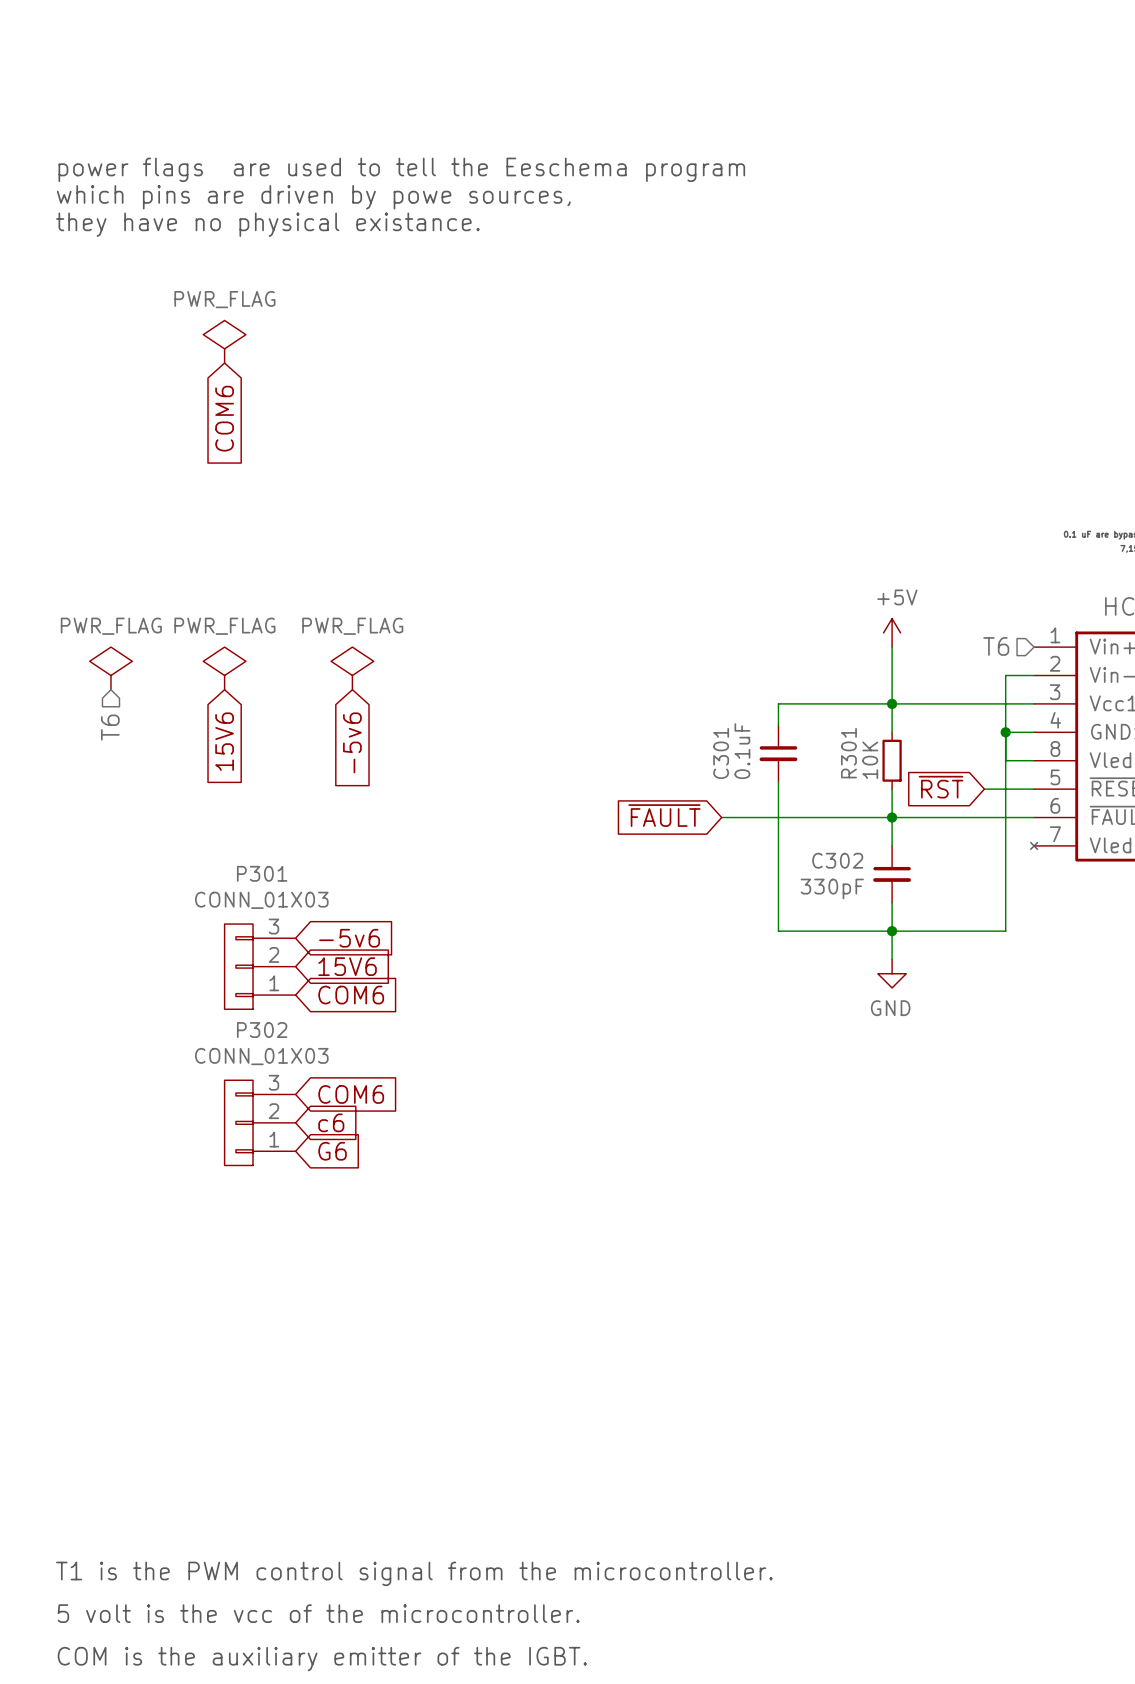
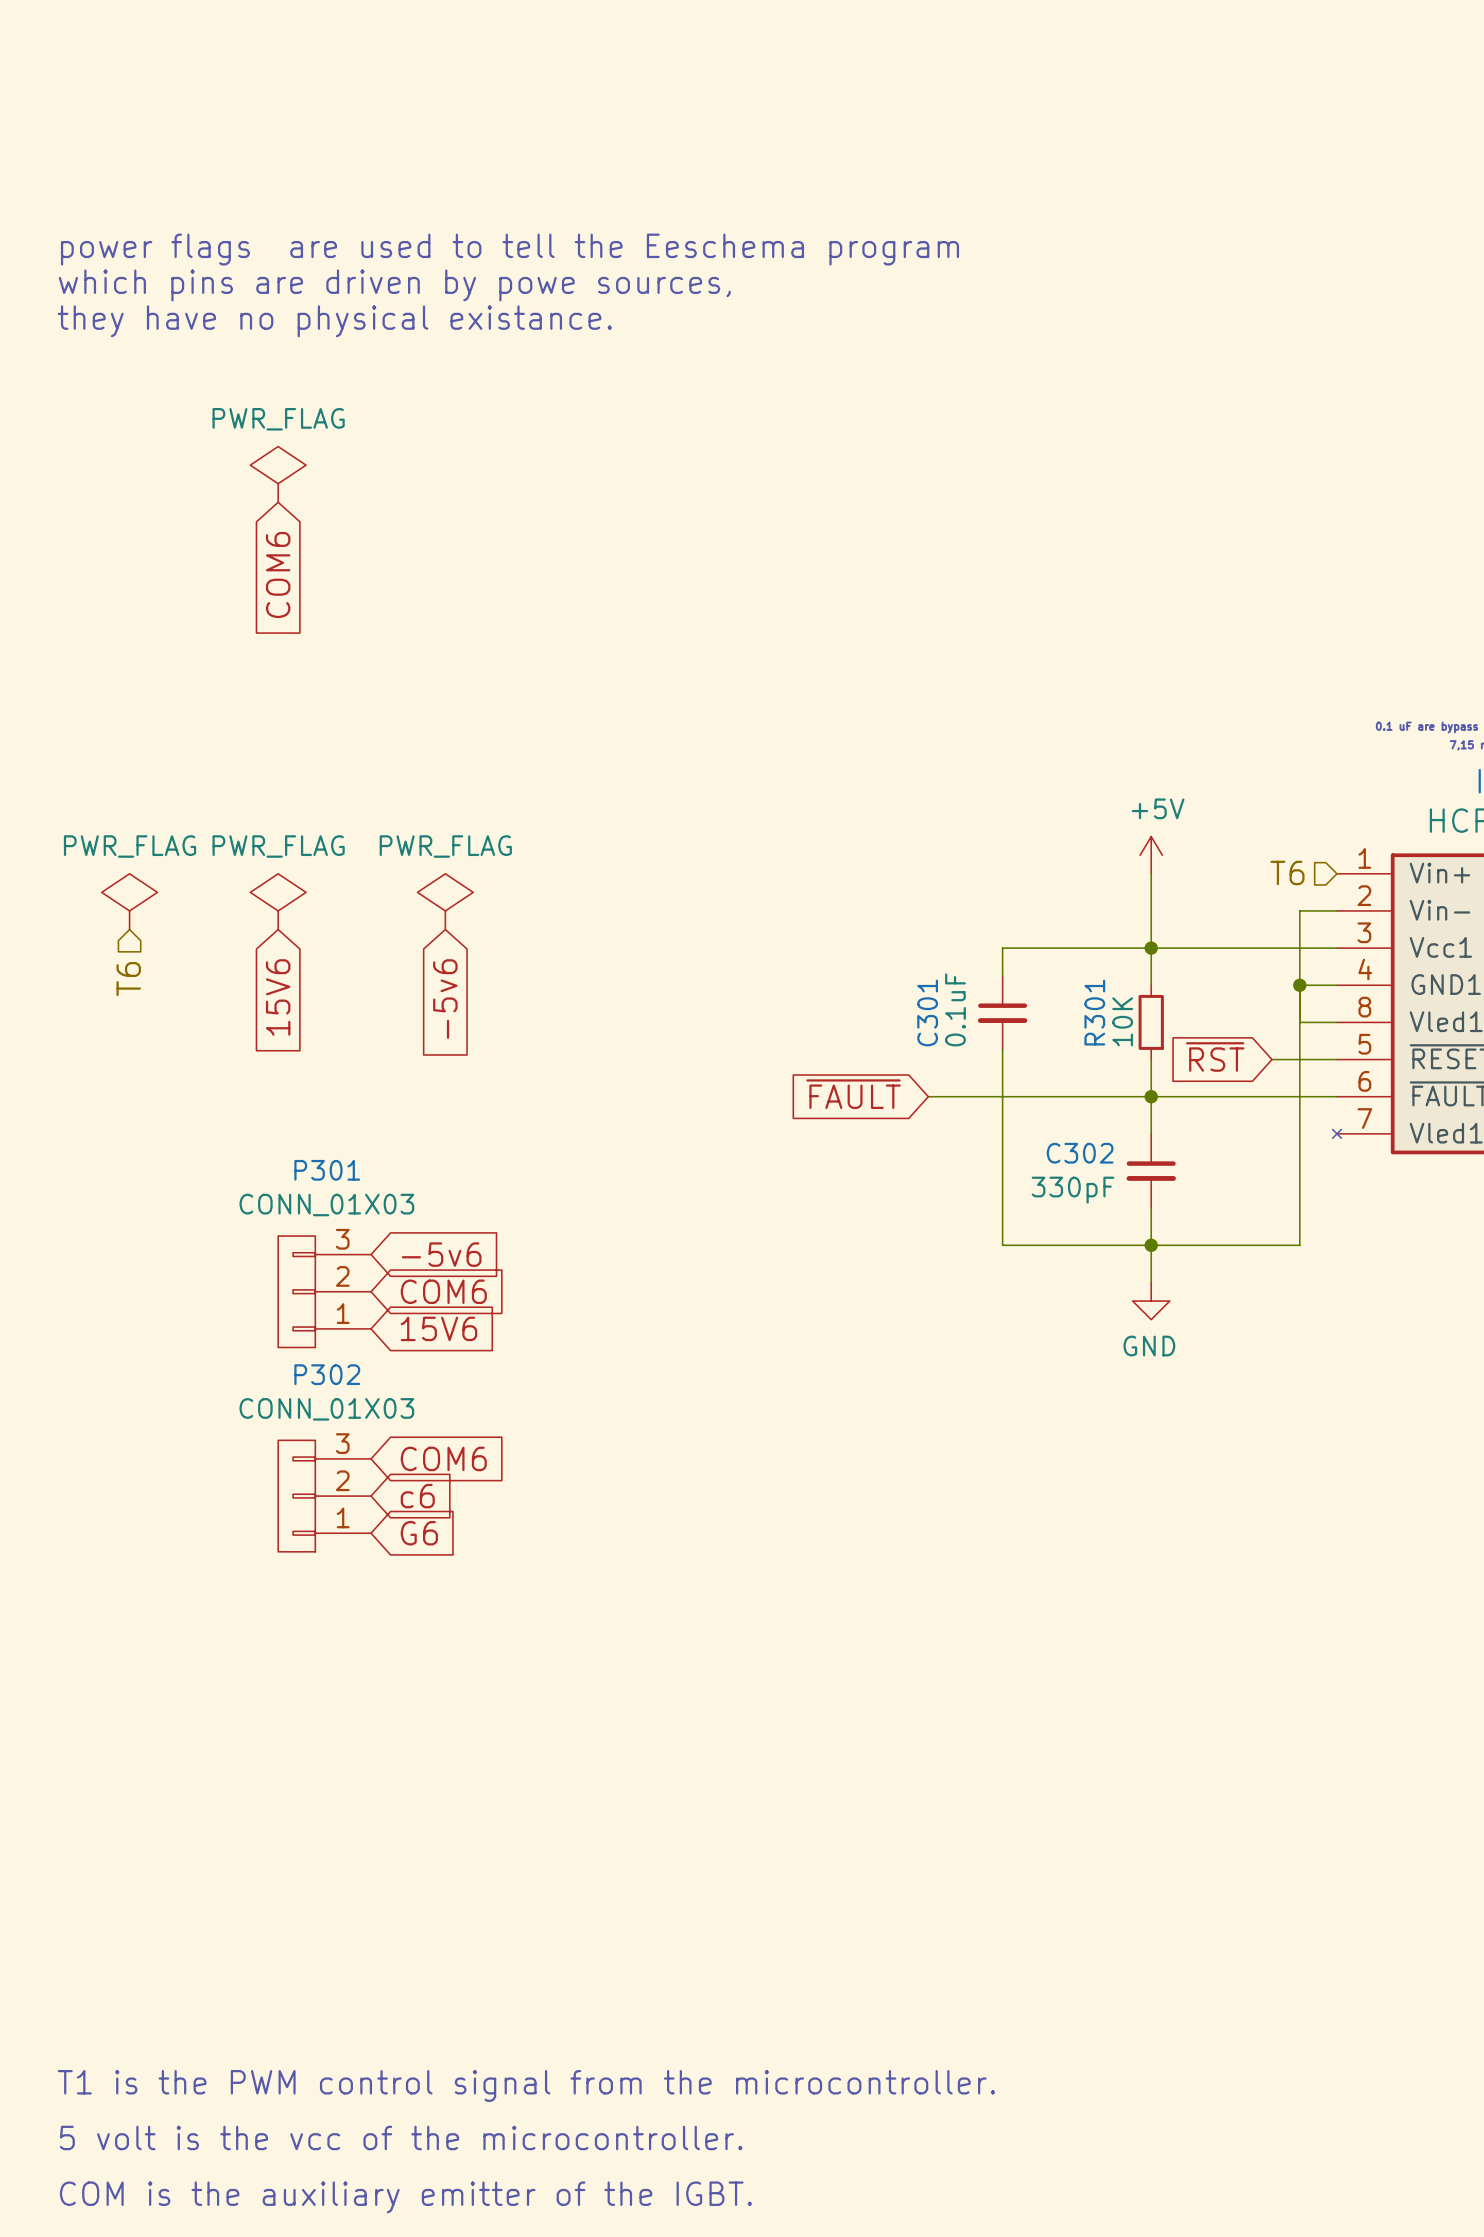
global label: 15V6 (347, 966) -> COM6 (443, 1291)
global label: COM6 (351, 995) -> 15V6 (438, 1328)

